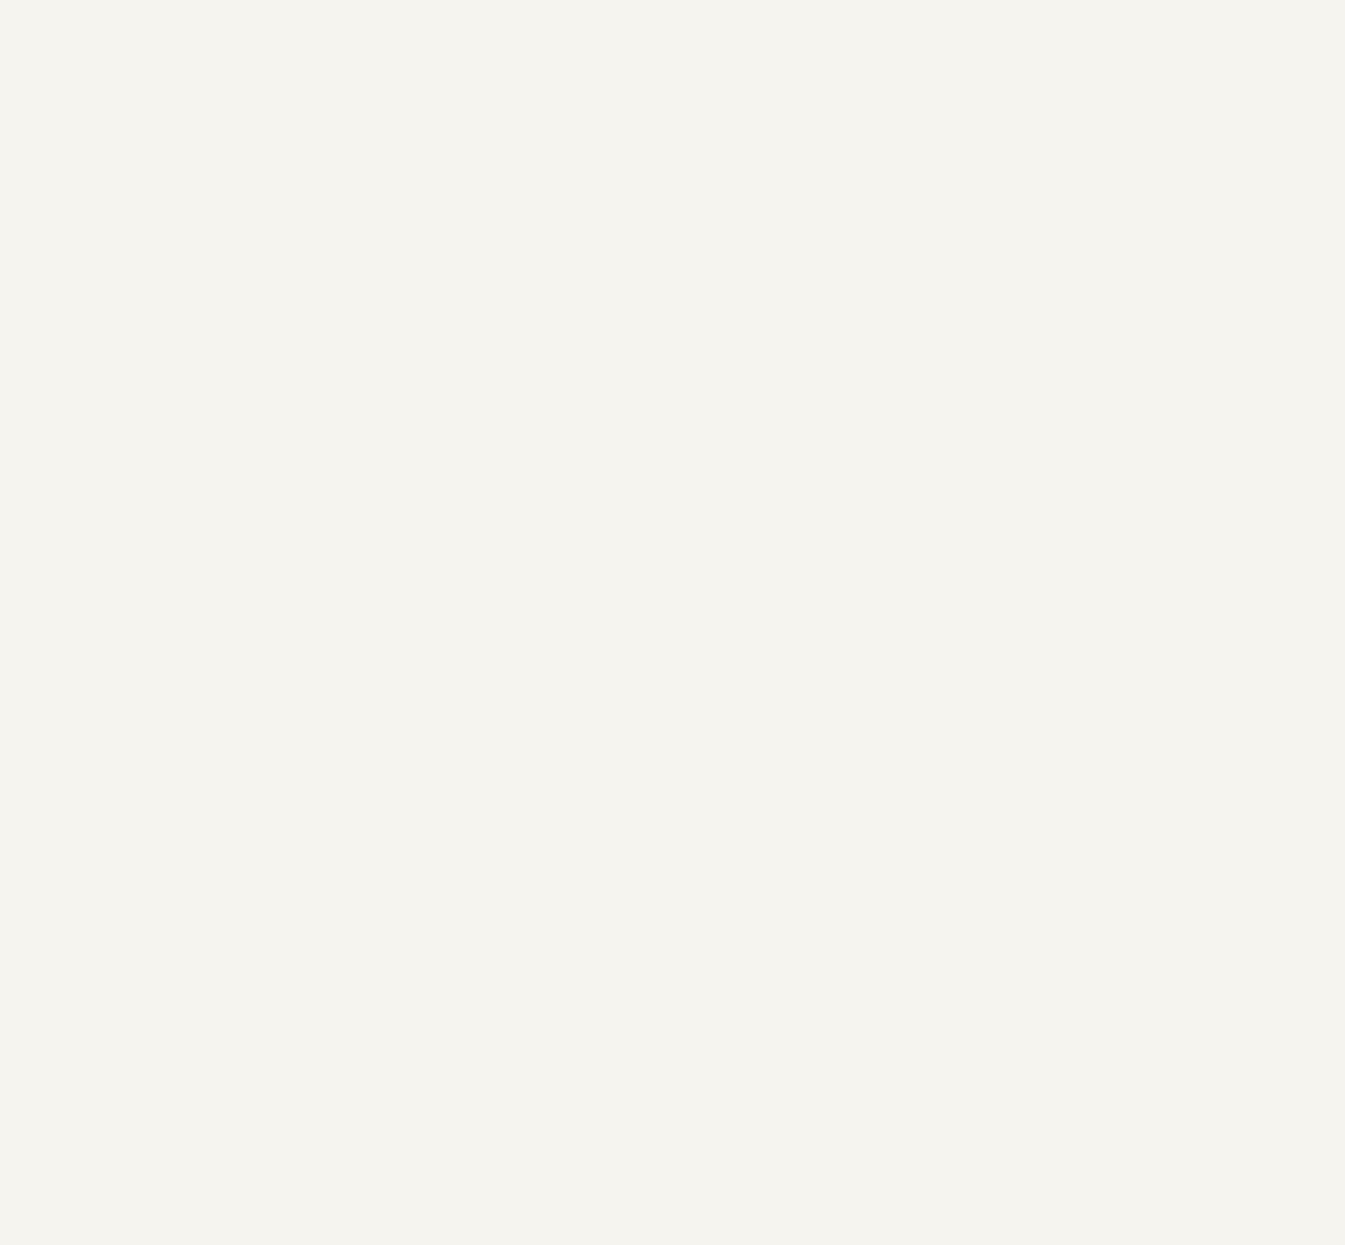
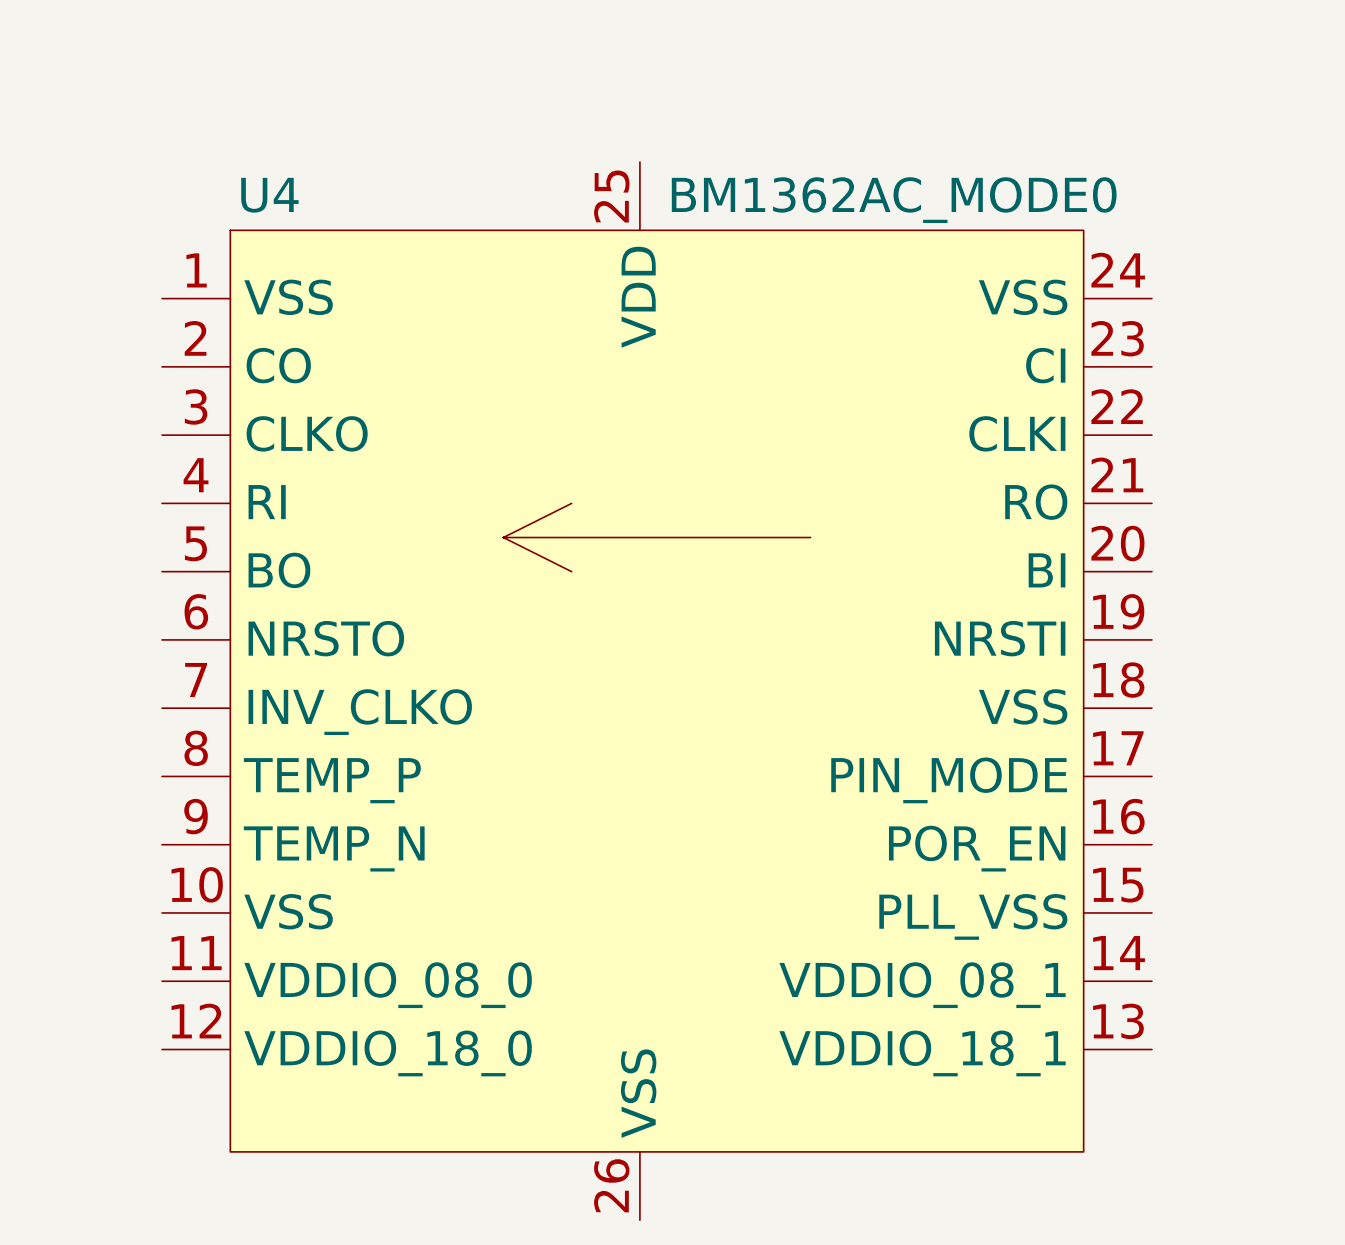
U4: none -> BM1362AC_MODE0 (656, 691)

